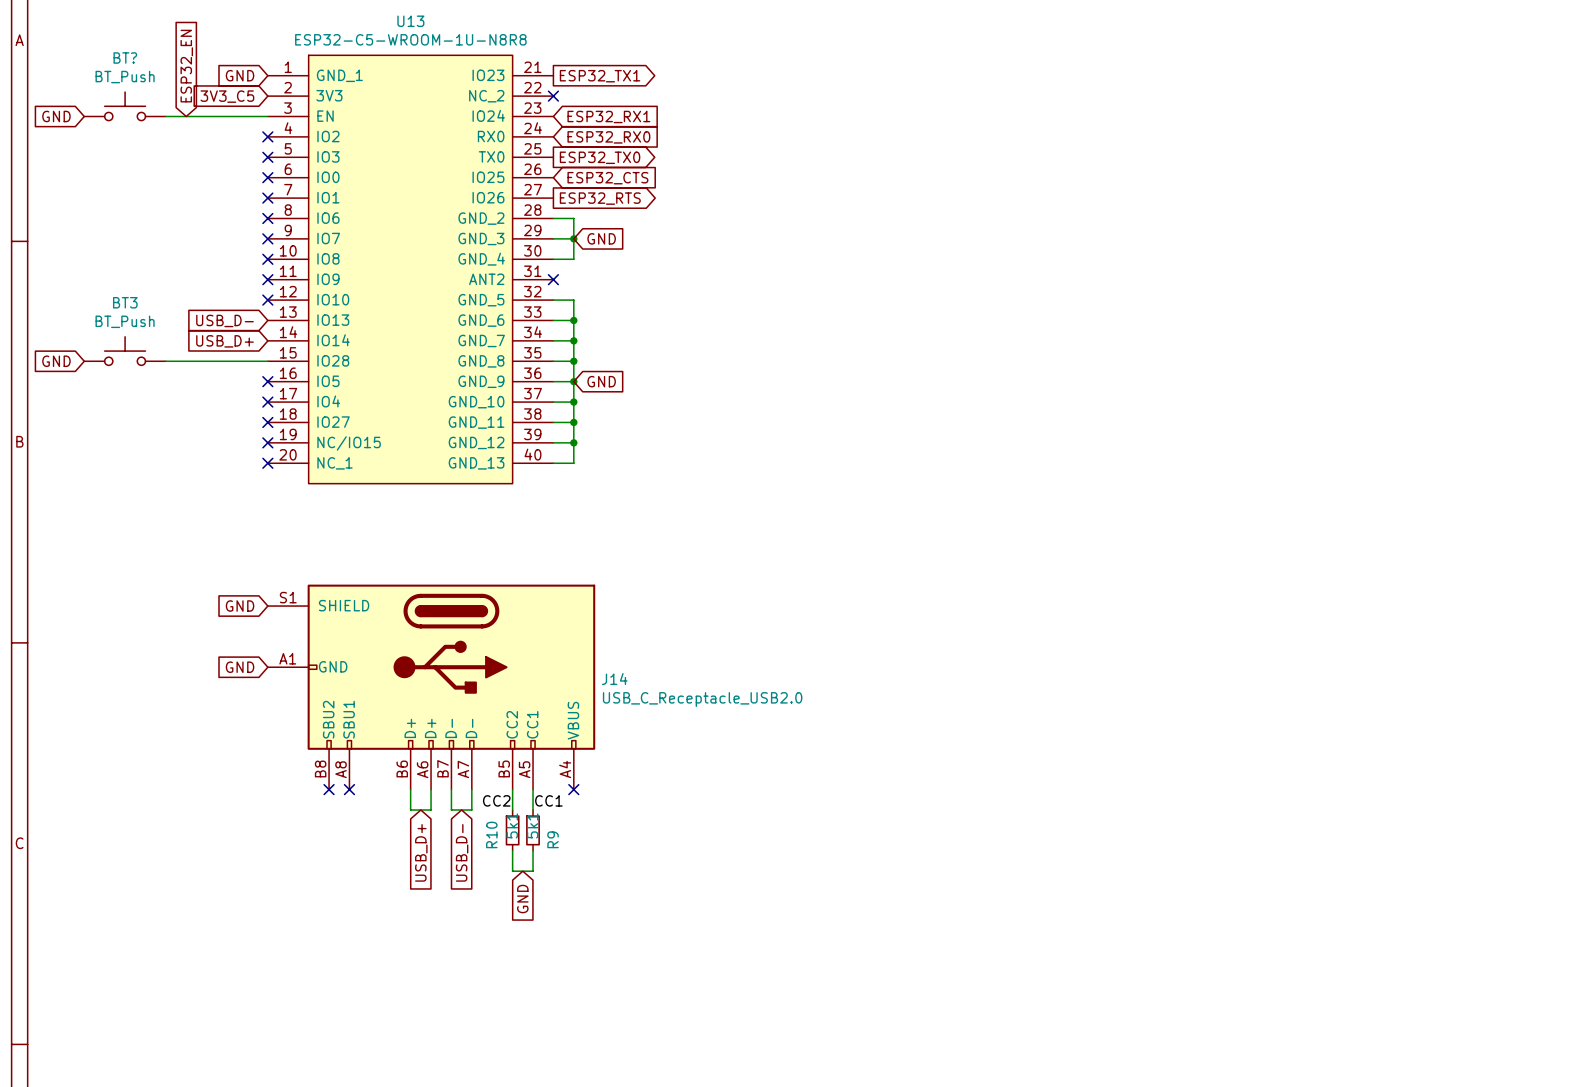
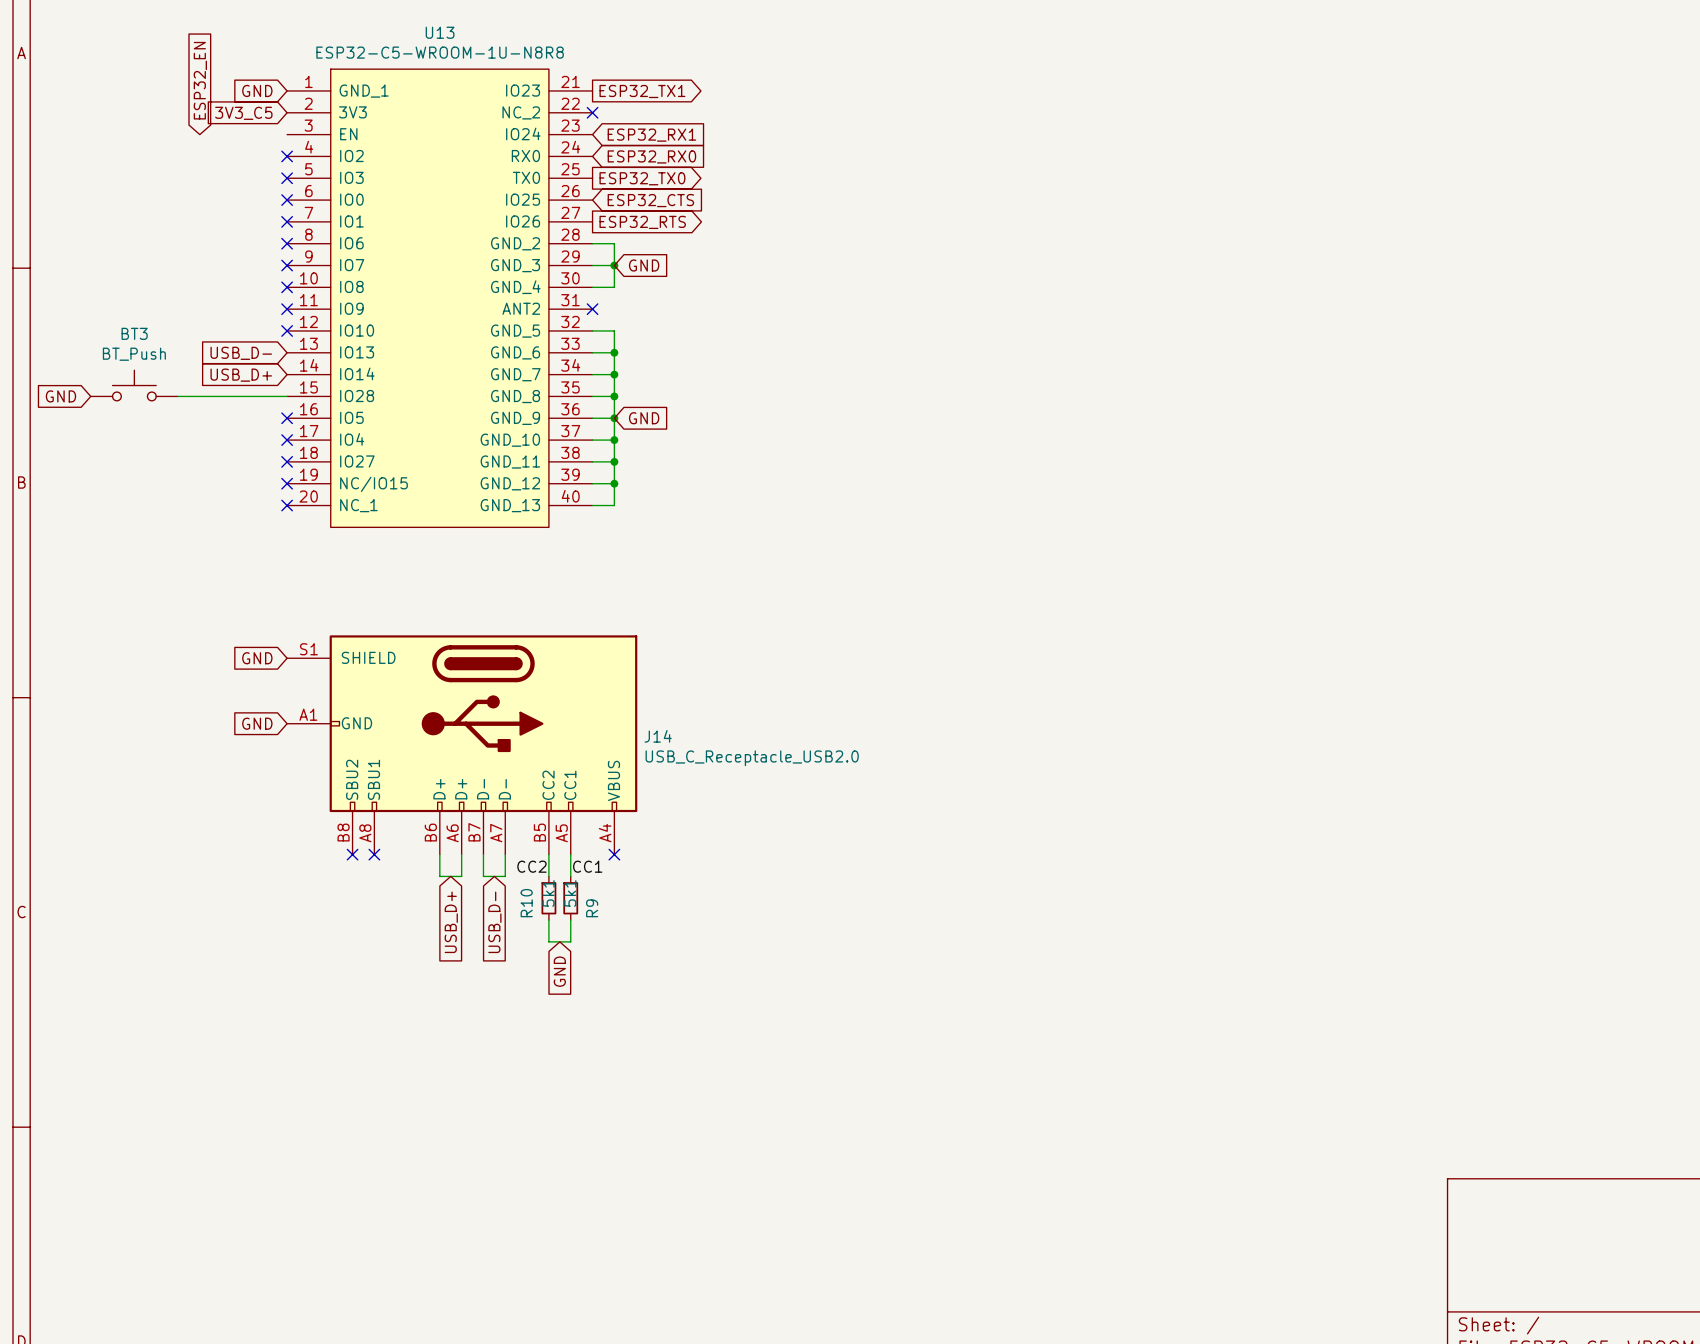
BT?: BT_Push (125, 106) -> none
global label: GND (56, 116) -> none
wire: (165, 116) (267, 116) -> none

